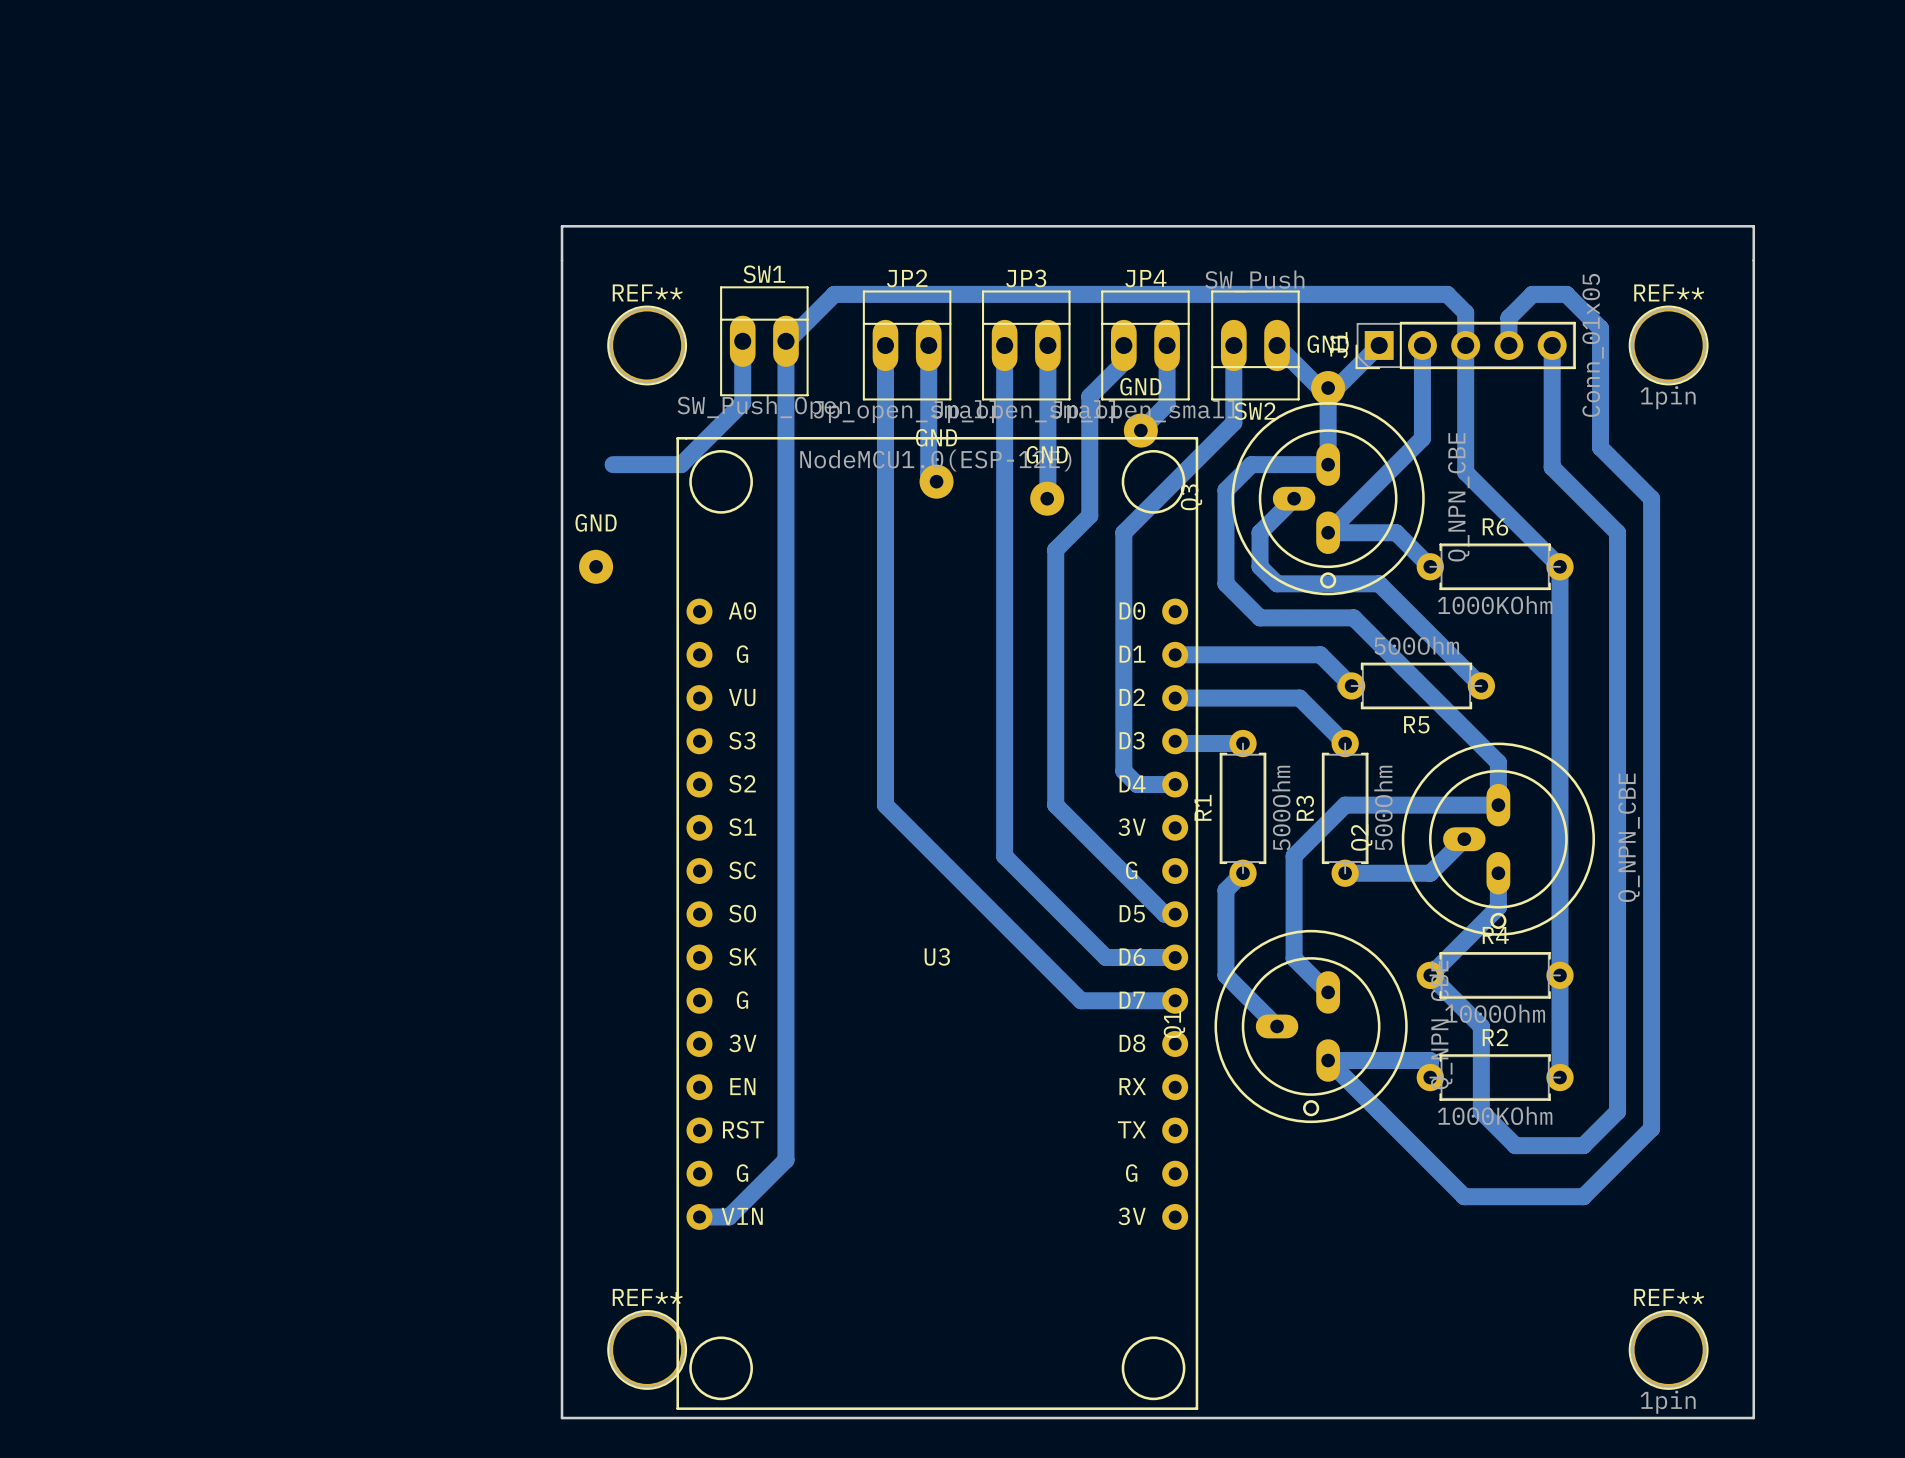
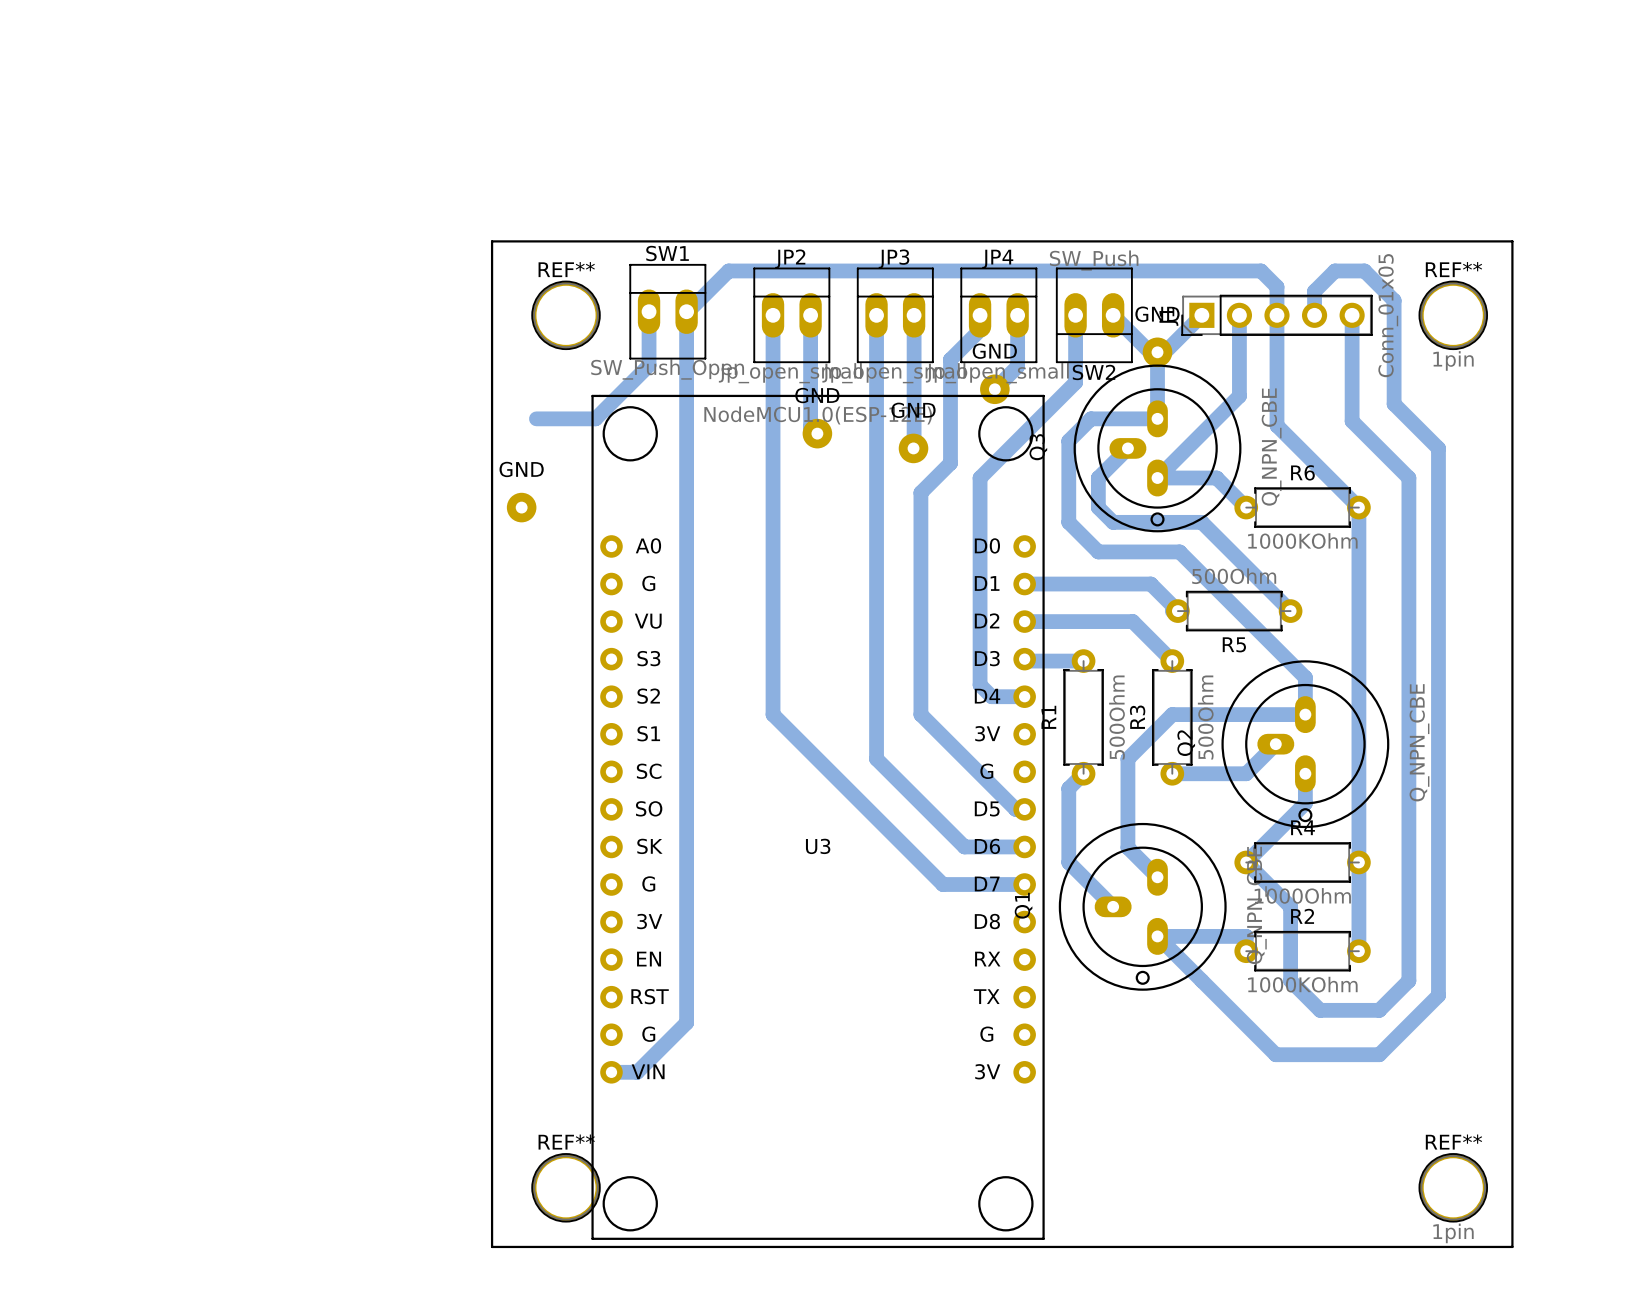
board edge: (562, 260) (562, 226) (1753, 226) (1753, 1418) (1736, 1418) -> (492, 241) (1512, 241) (1512, 1246)

